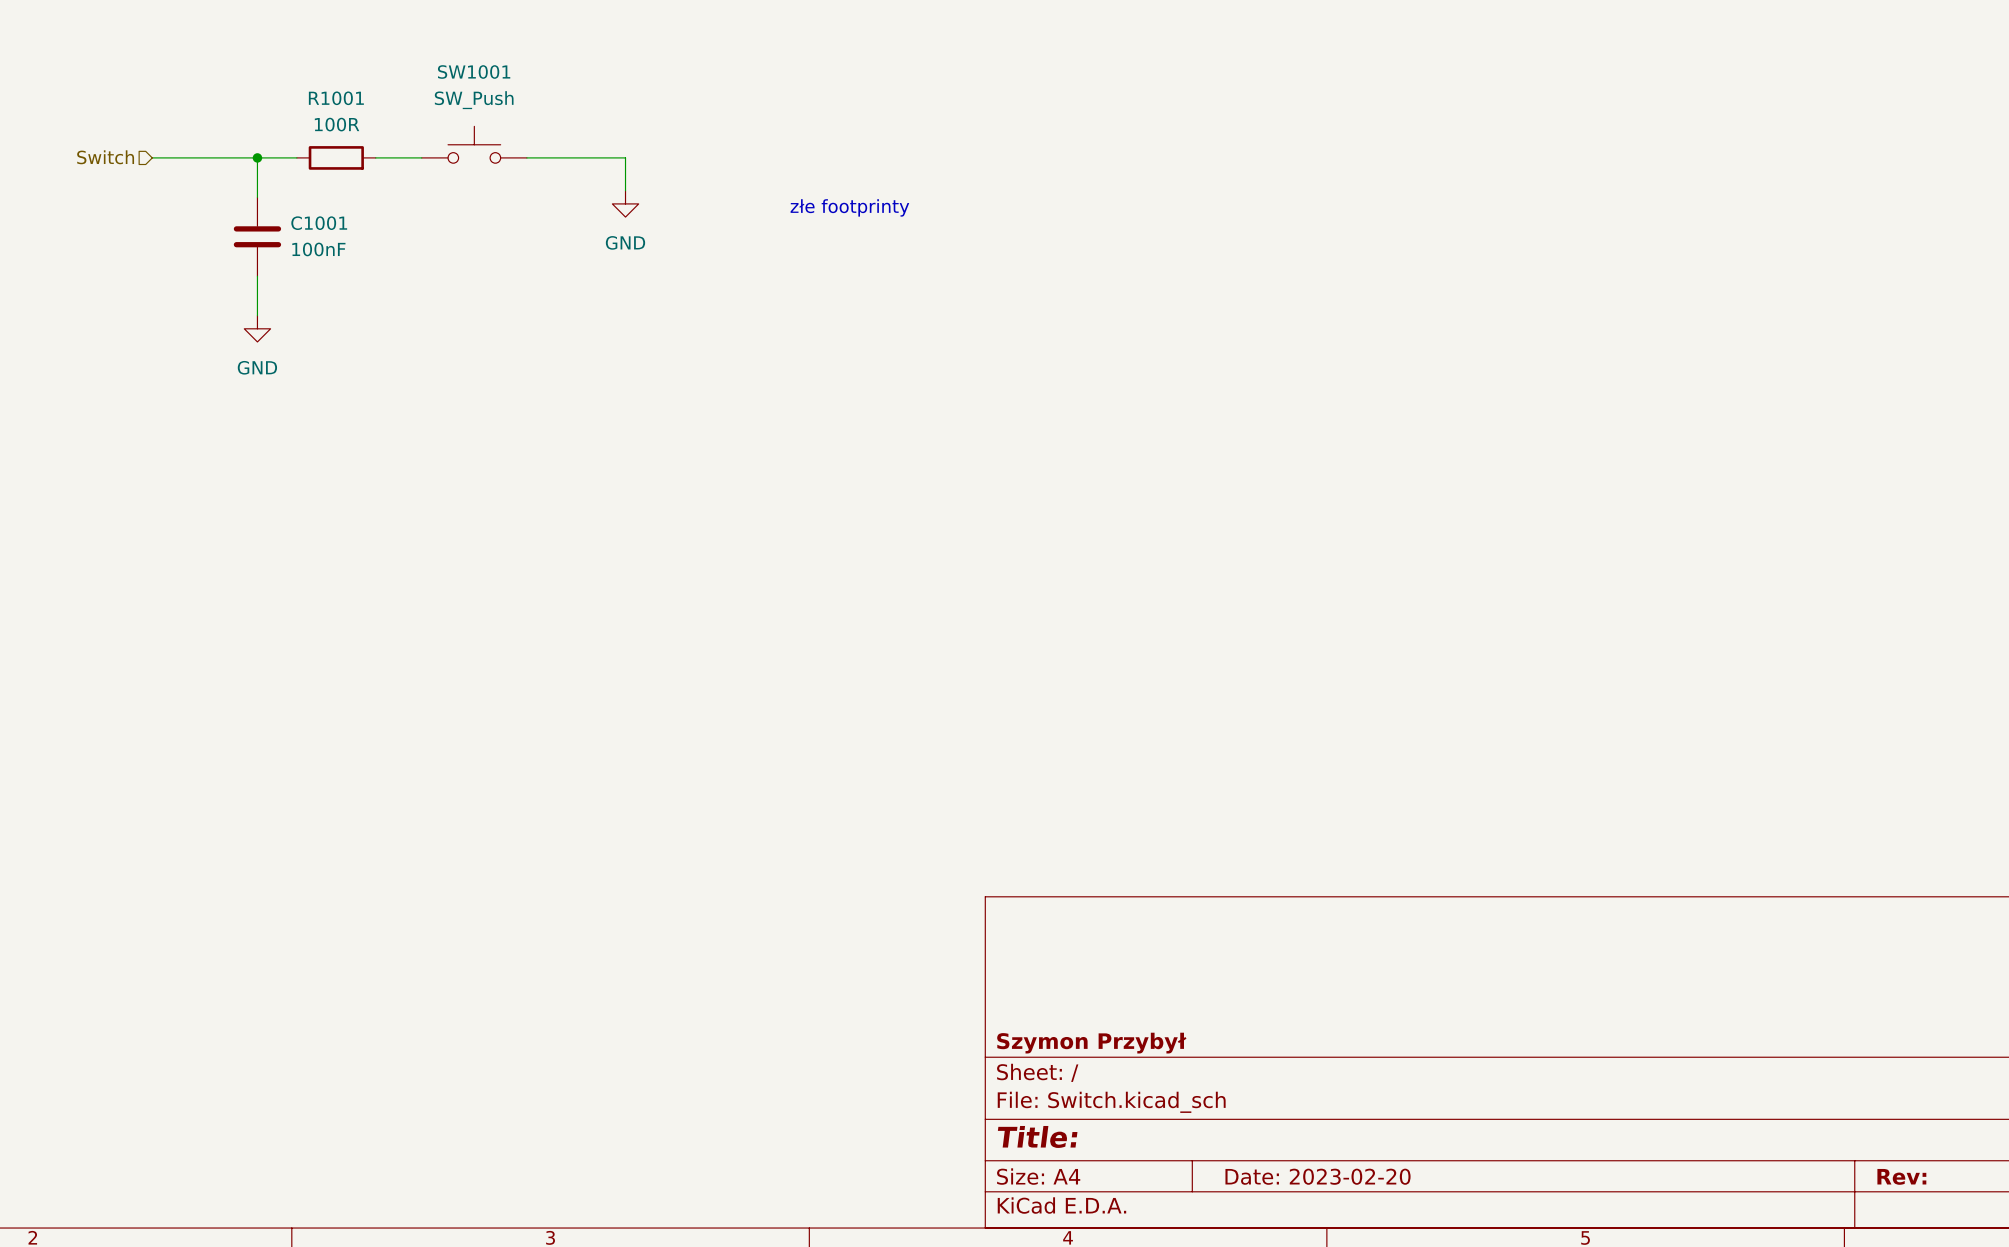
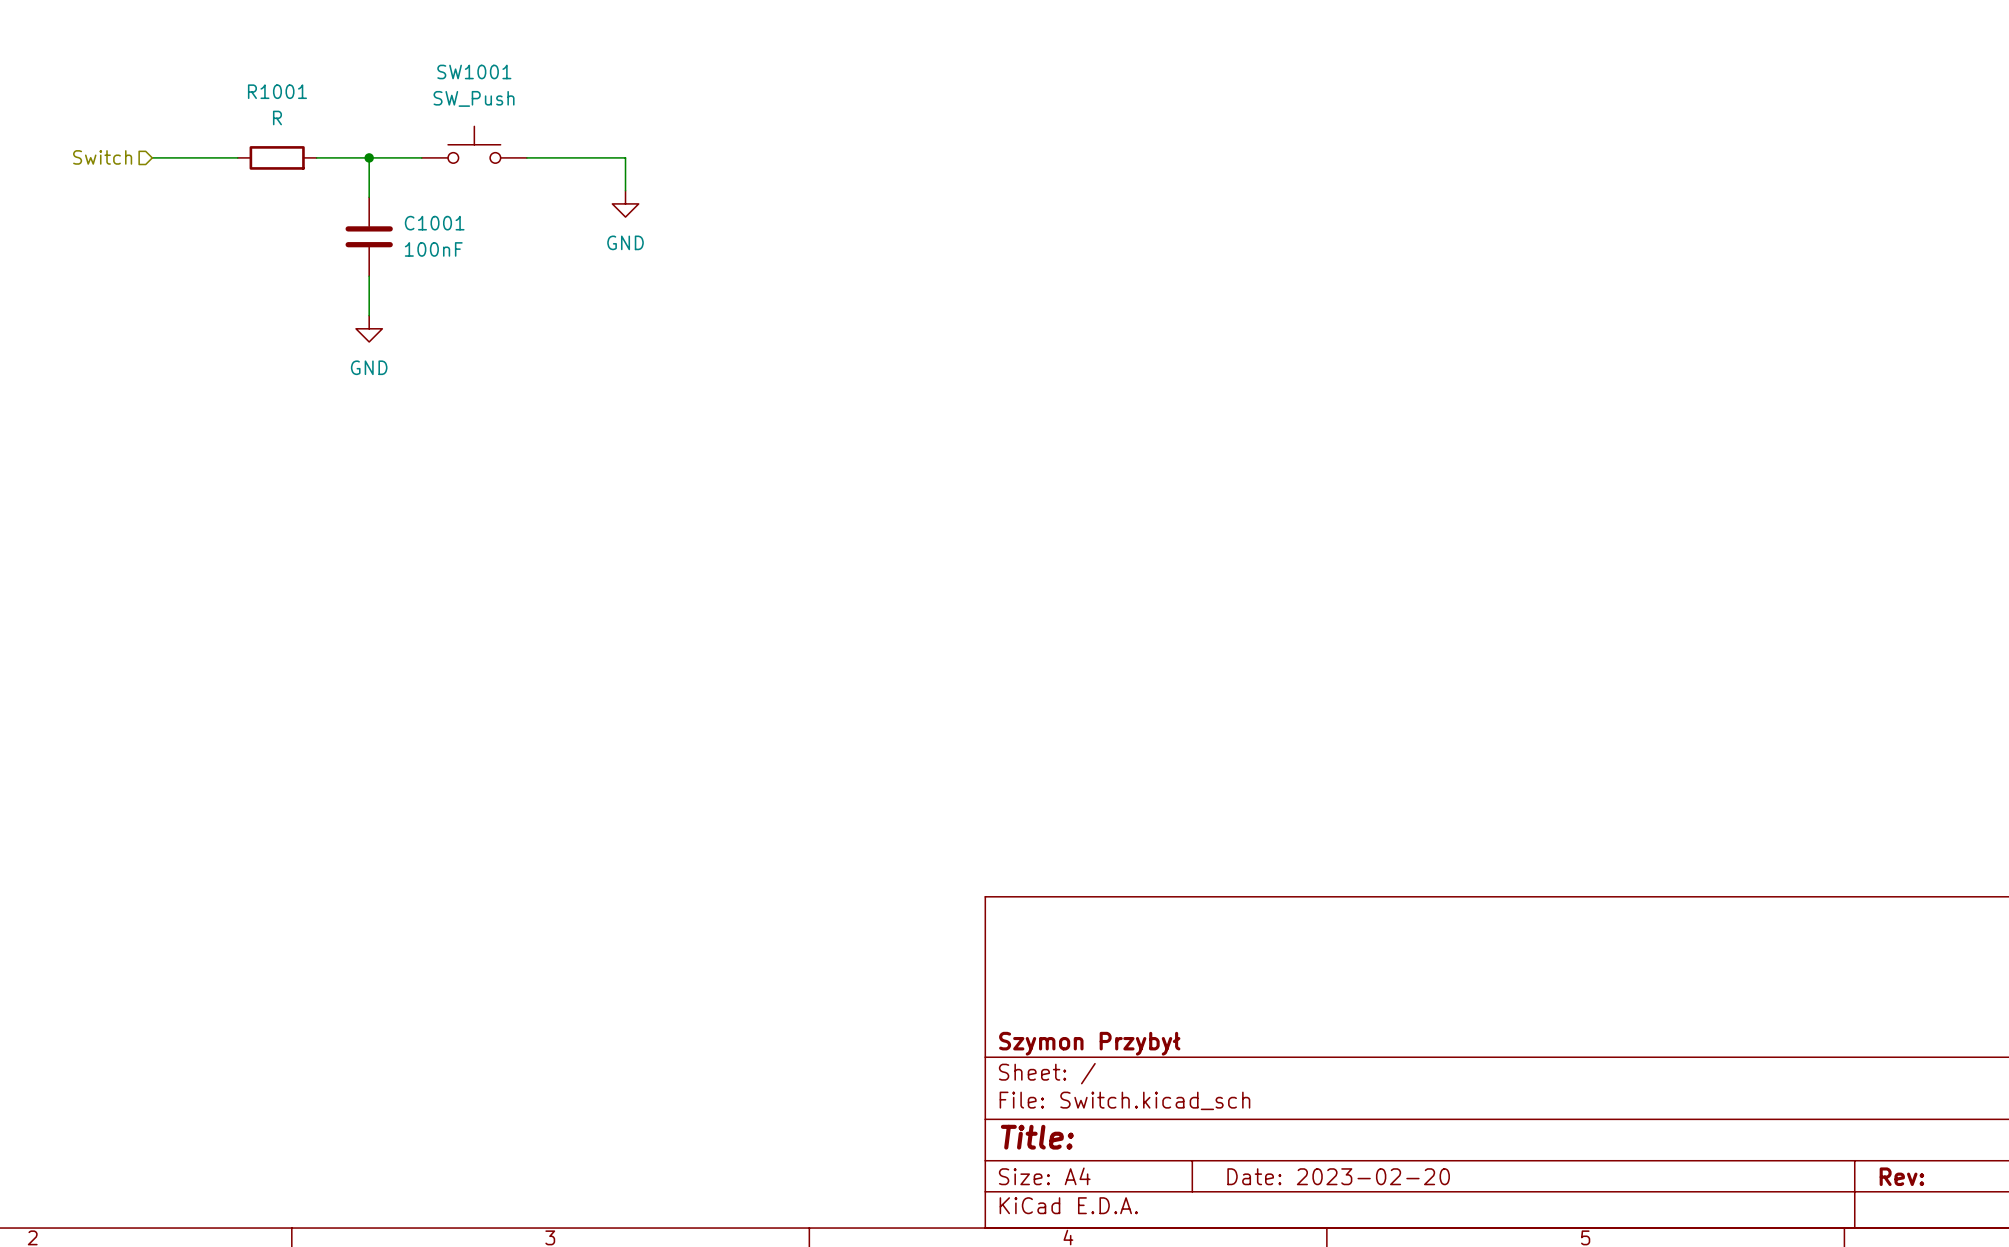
R1001 name position: R1001 (336, 98) -> R1001 (277, 91)
R1001 value: 100R (337, 124) -> R (277, 117)
wire: (237, 157) (296, 157) -> (316, 157) (375, 157)
wire: (257, 157) (257, 197) -> (369, 157) (369, 197)
junction: (257, 157) -> none
R1001 position: (336, 157) -> (277, 157)
junction: none -> (369, 157)
text: złe footprinty (849, 207) -> none
C1001 position: (257, 236) -> (369, 236)
wire: (257, 276) (257, 315) -> (369, 276) (369, 315)
power symbol position: GND (257, 328) -> GND (369, 328)

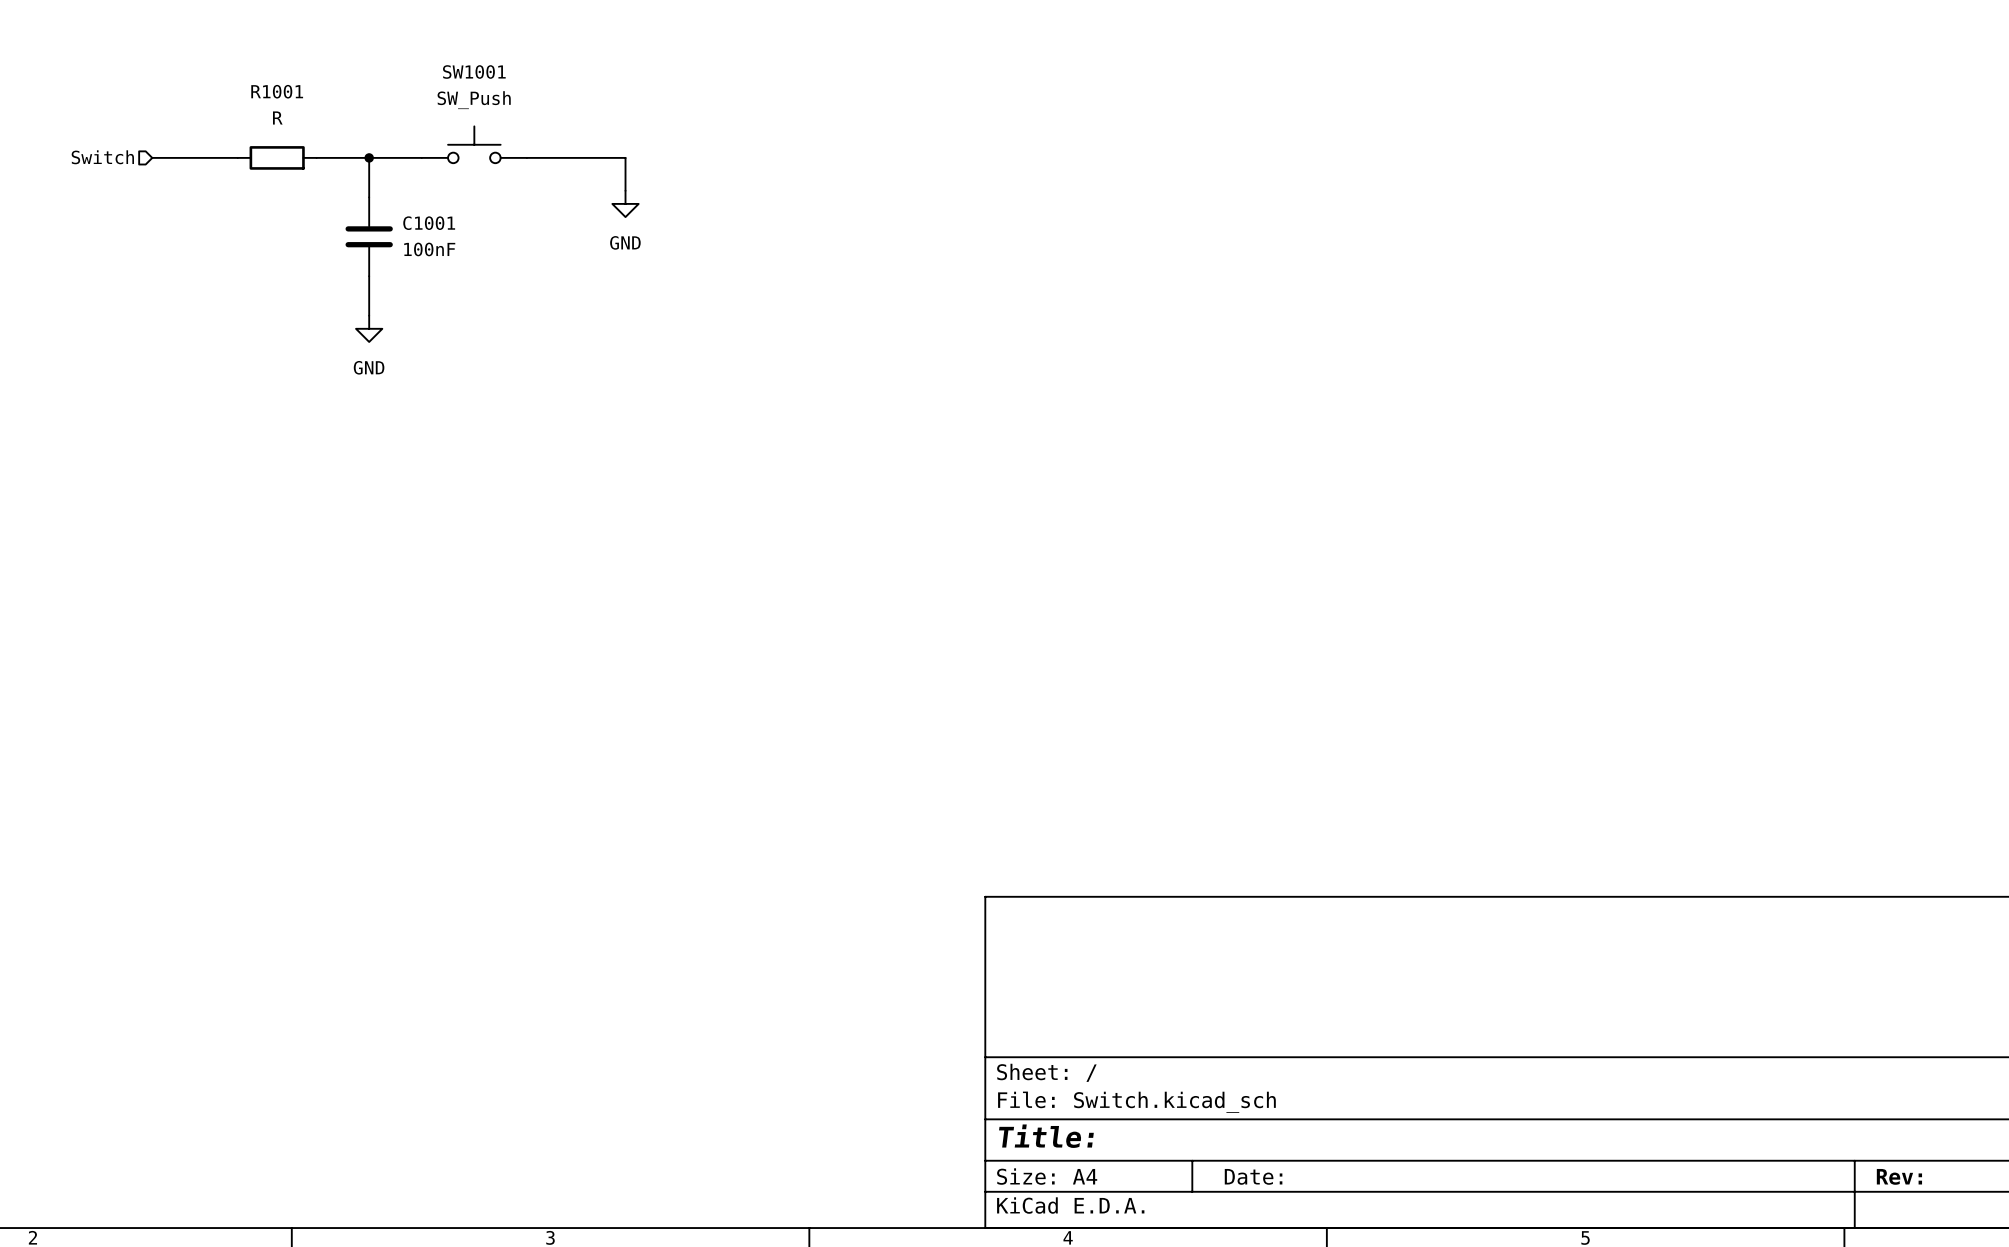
title block: Szymon Przybył (1089, 1043) -> none
title block: Date: 2023-02-20 (1338, 1176) -> Date: (1253, 1176)

